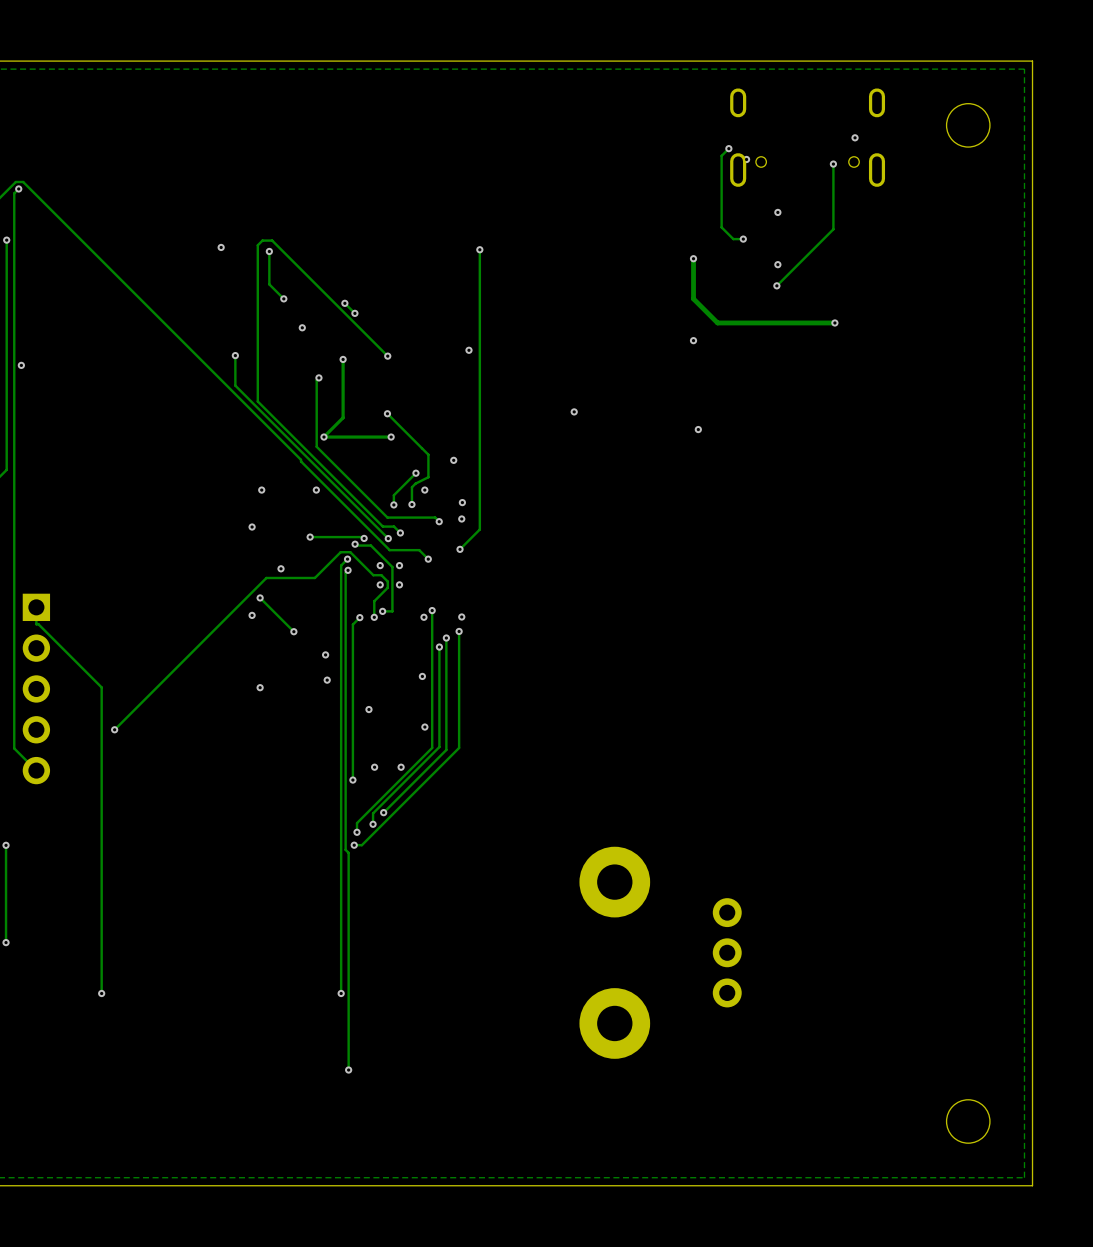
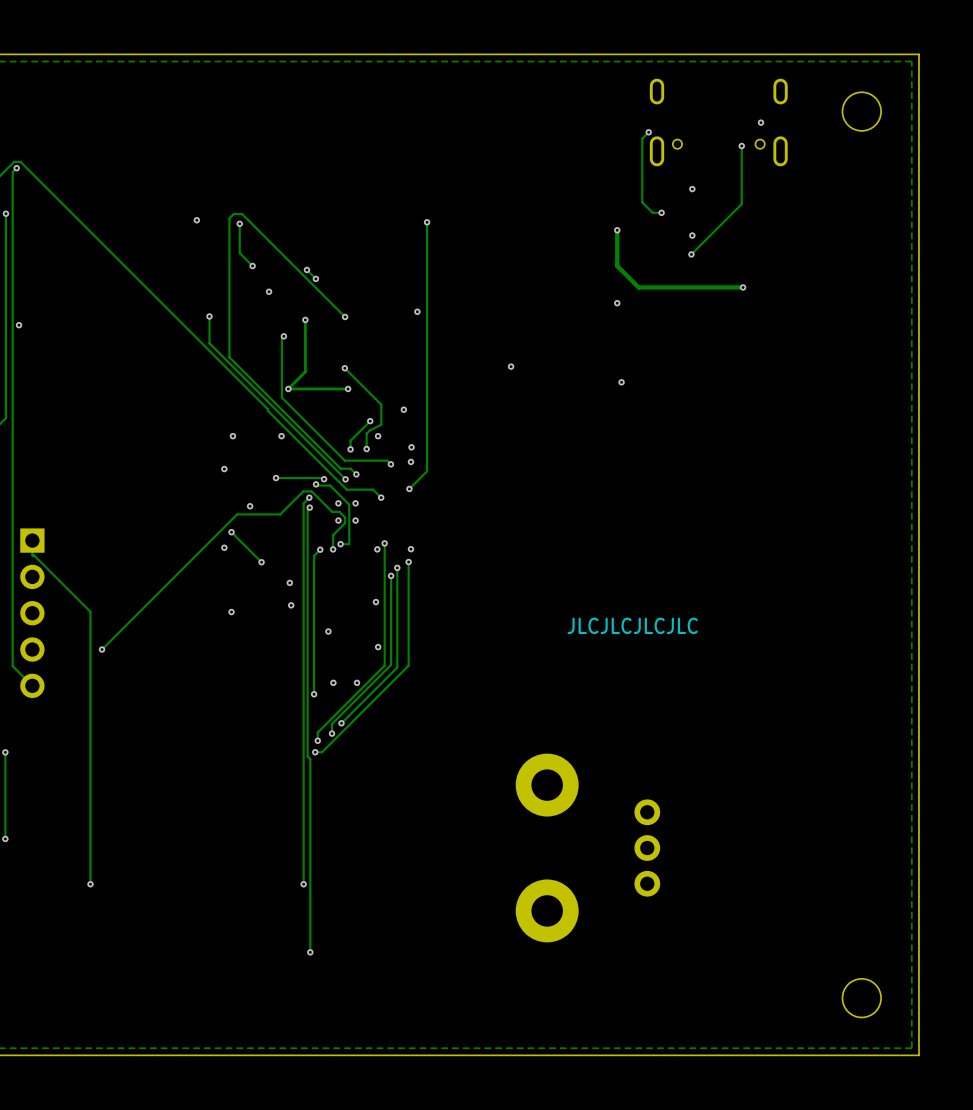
via: (746, 159) -> none
text: none -> JLCJLCJLCJLC (632, 625)

